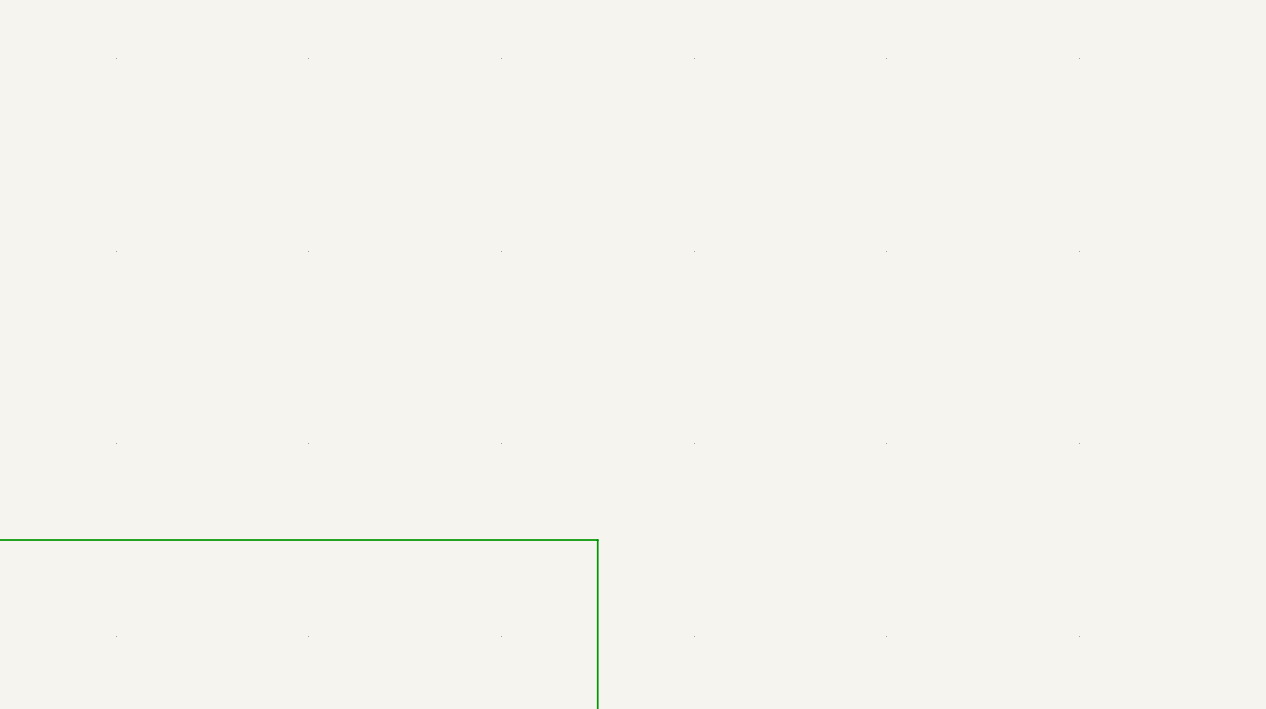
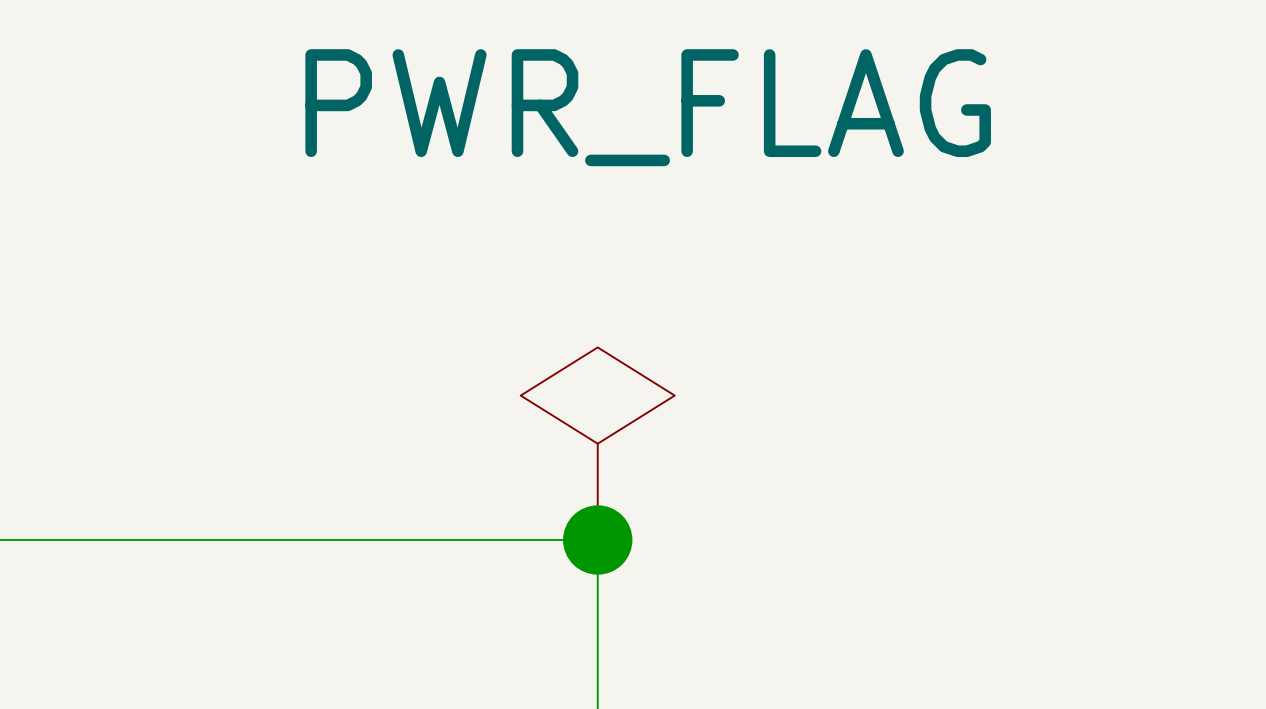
power symbol: none -> PWR_FLAG (597, 443)
junction: none -> (597, 540)

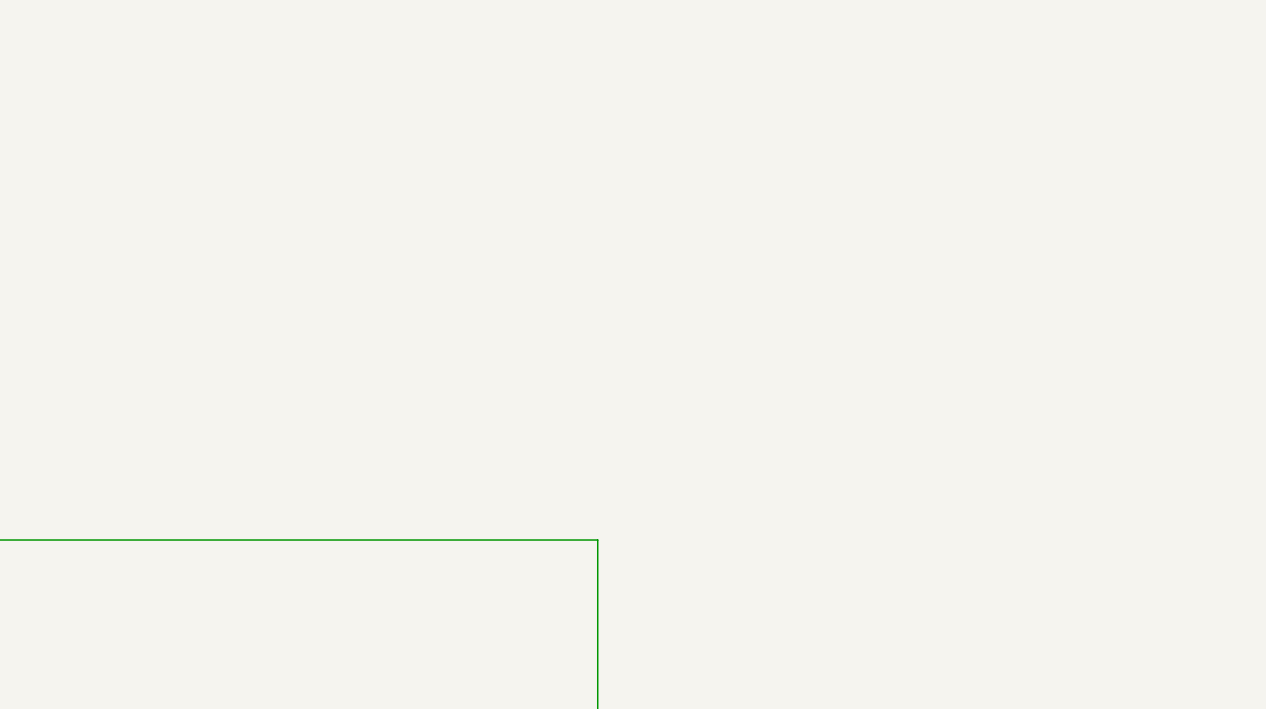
power symbol: PWR_FLAG (597, 443) -> none
junction: (597, 540) -> none

